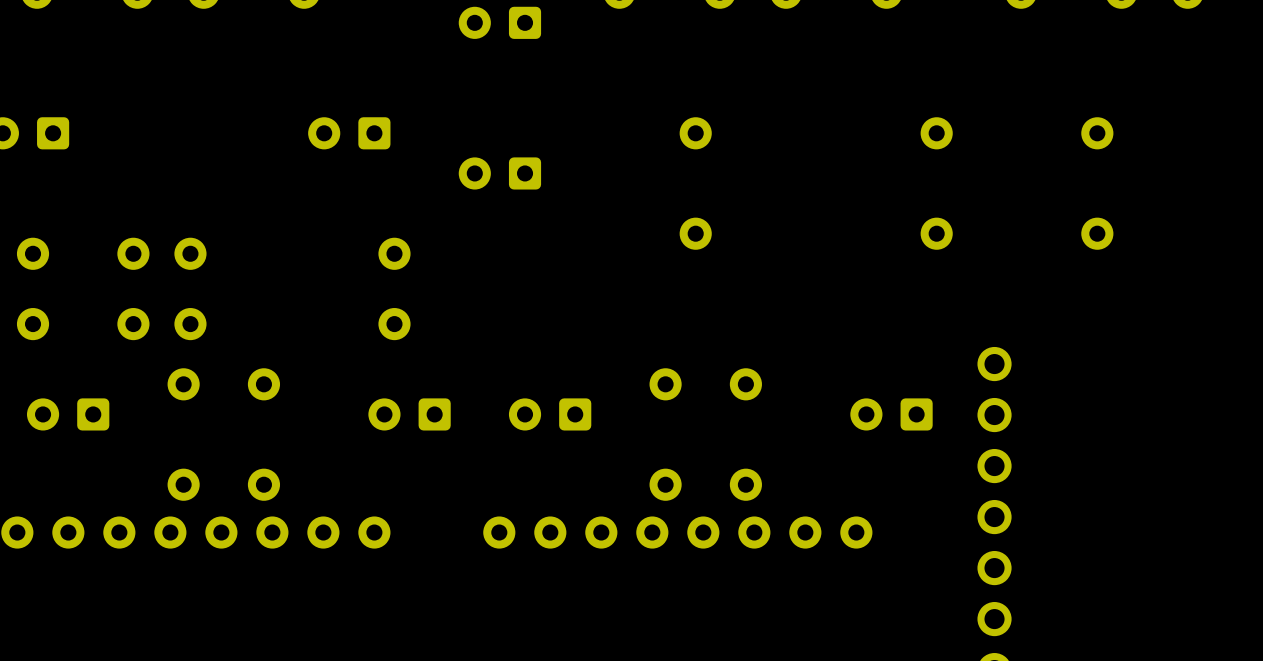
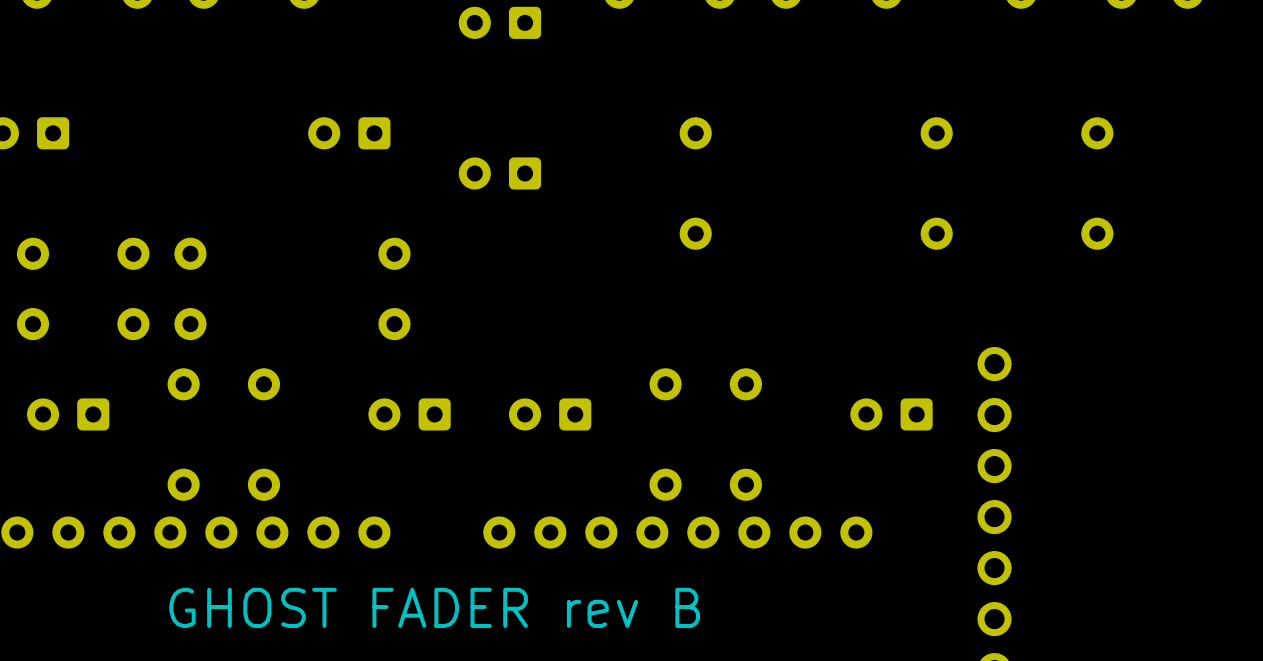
text: none -> GHOST FADER rev B (434, 607)

